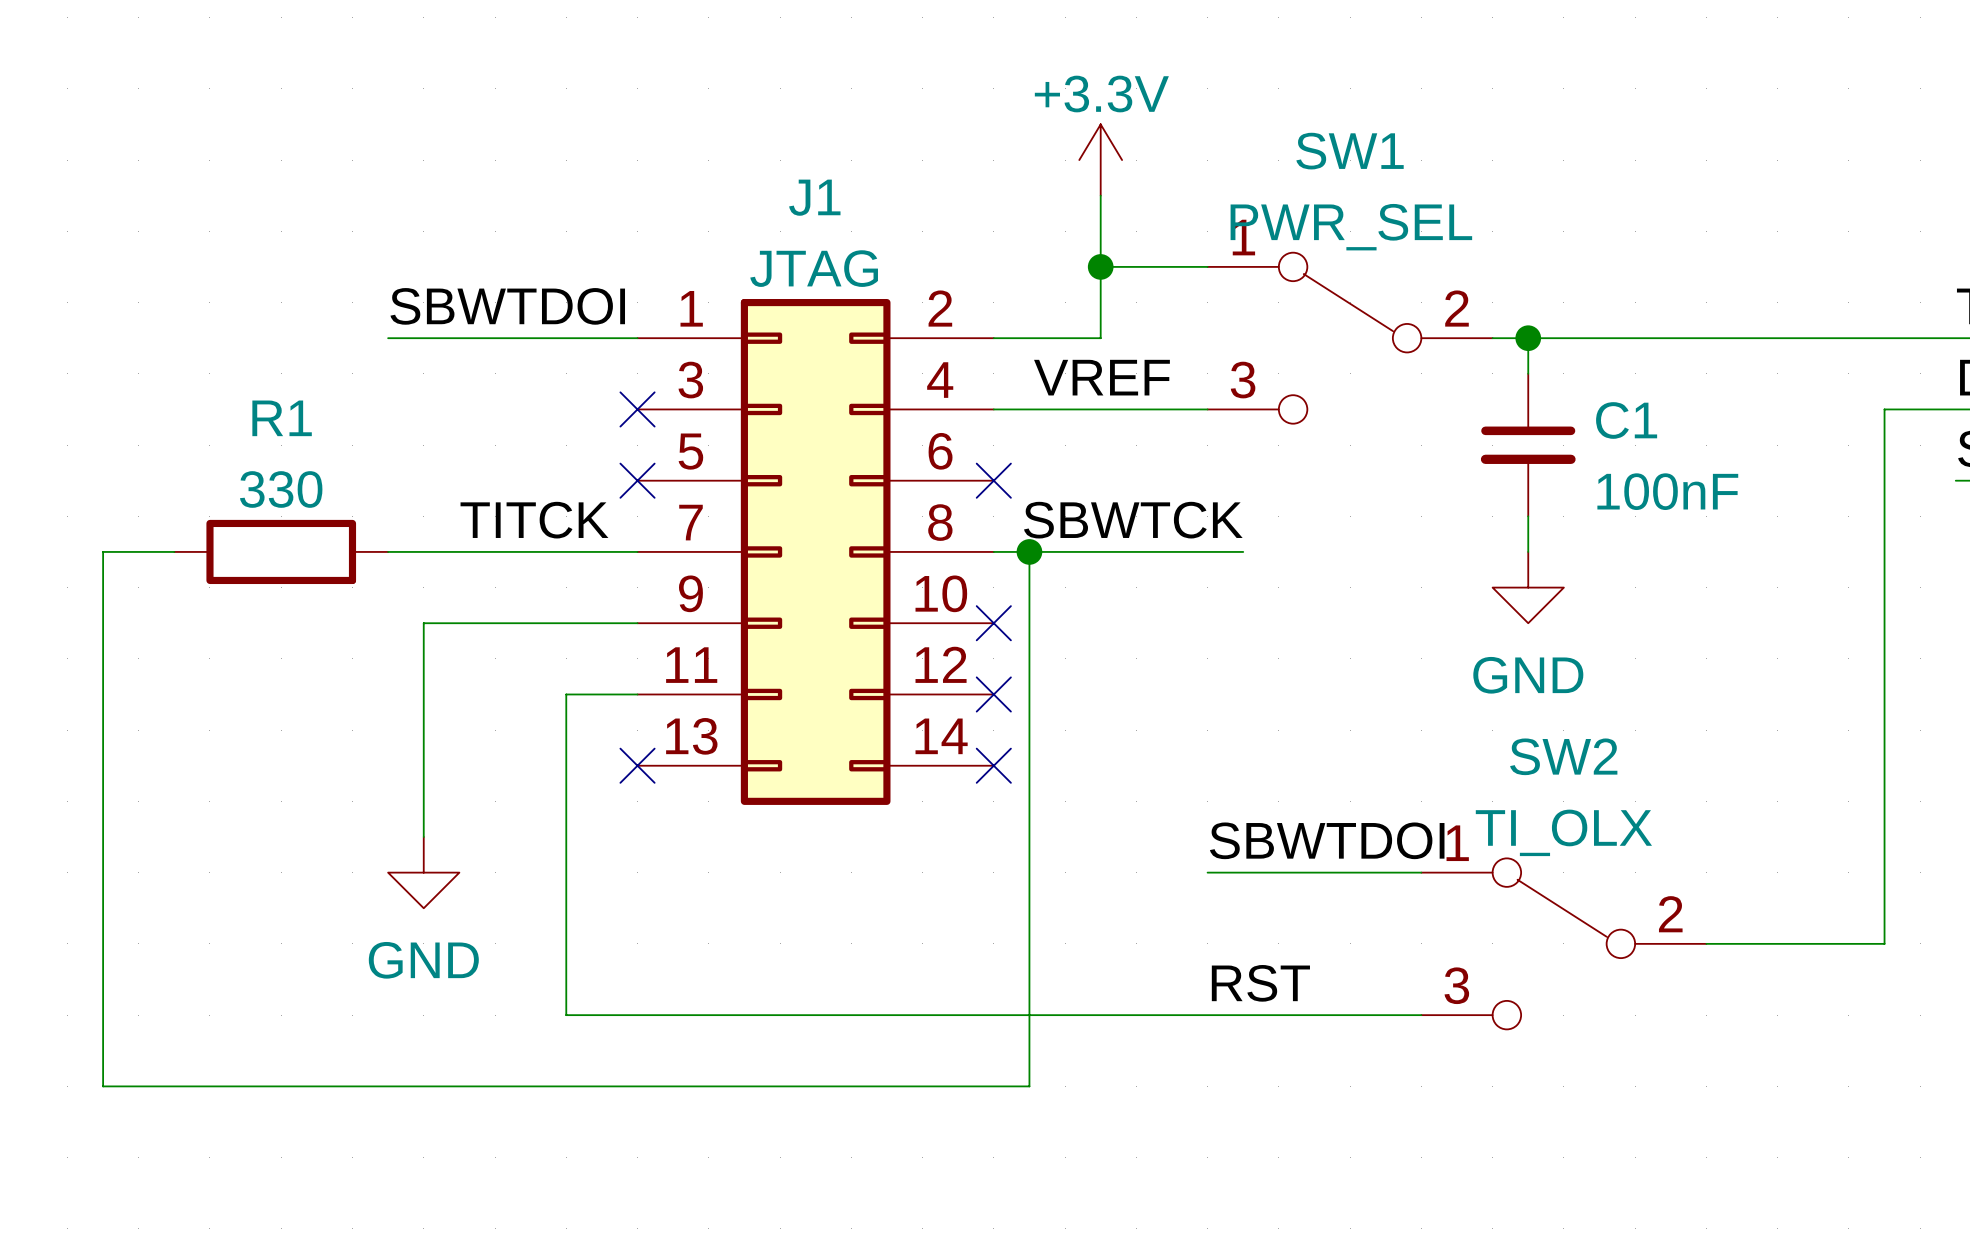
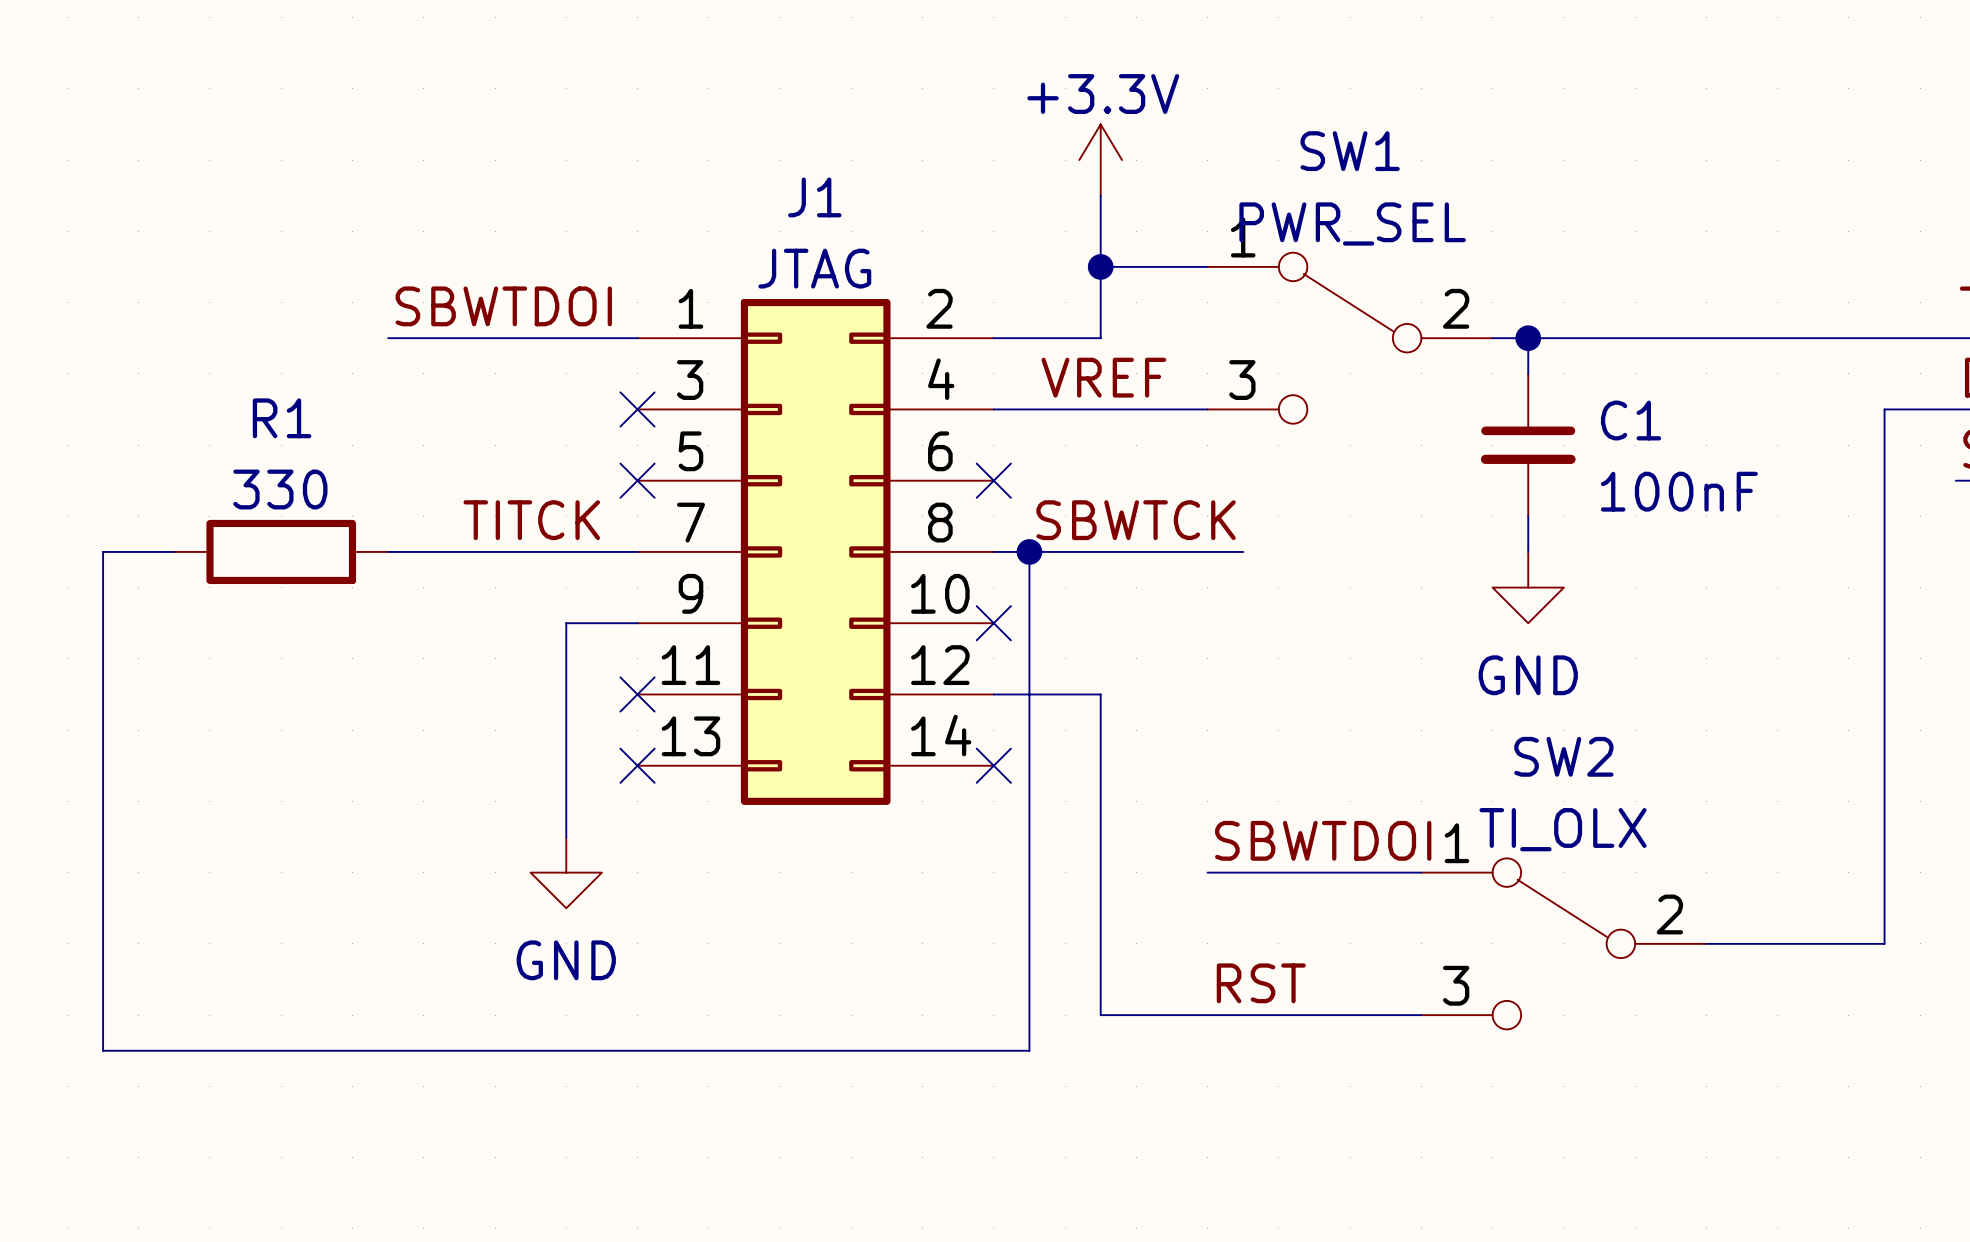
wire: (566, 623) (423, 623) (423, 836) -> none
wire: (566, 694) (637, 694) -> (566, 694) (566, 623)
no-connect mark: none -> (637, 694)
no-connect mark: (993, 694) -> none
wire: (566, 836) (566, 1015) (1100, 1015) -> (993, 694) (1100, 694) (1100, 1015)
power symbol position: GND (423, 872) -> GND (566, 872)
wire: (103, 1050) (103, 1086) (1029, 1086) (1029, 1050) -> (103, 1050) (1029, 1050)

